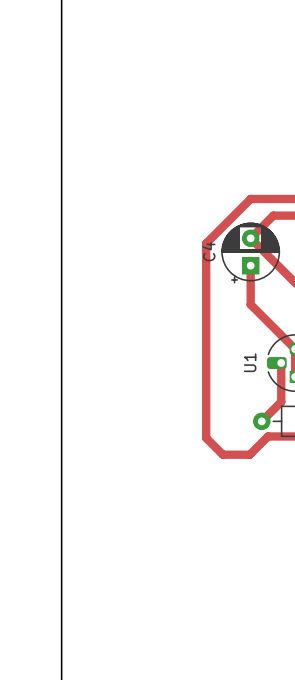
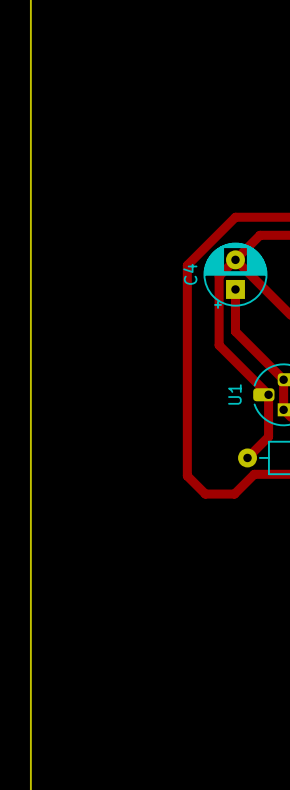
track: none -> (235, 259) (219, 276) (219, 345) (268, 394)

